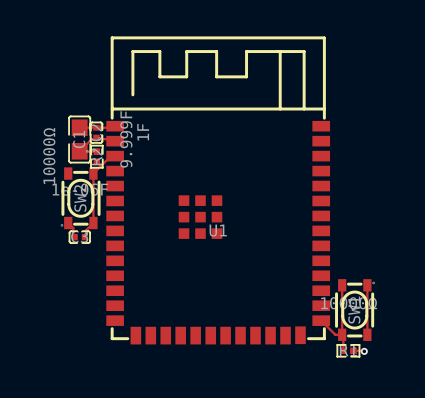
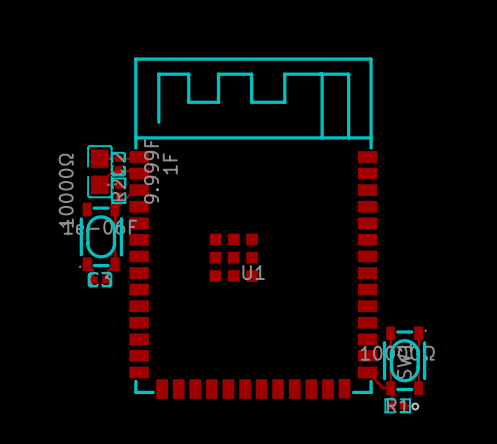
C1 name: C1 (79, 139) -> none
SW2 name: SW2 (80, 198) -> none

